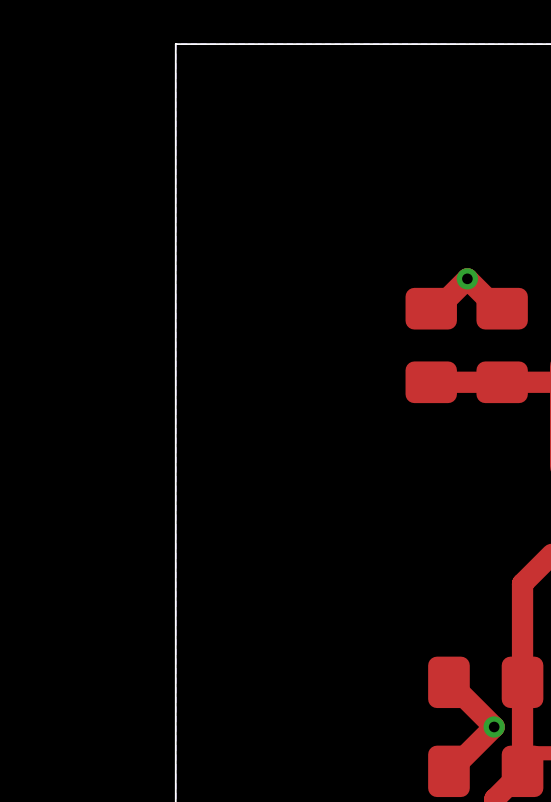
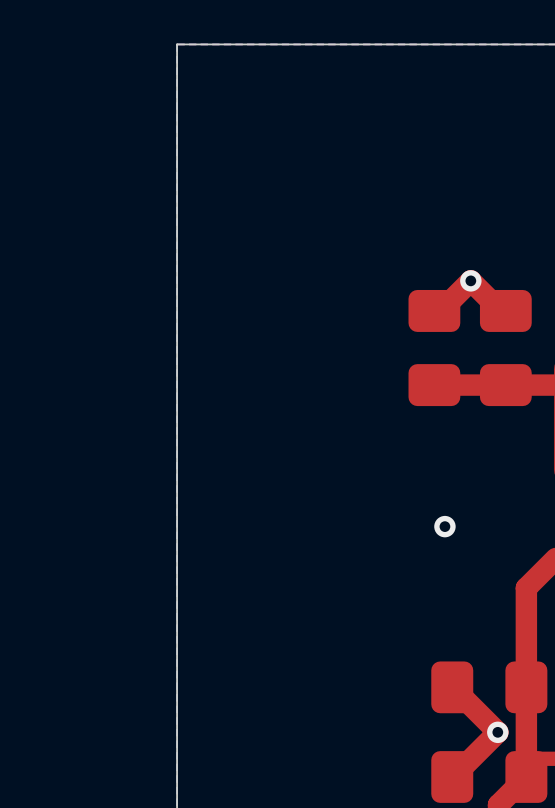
via: none -> (444, 526)

